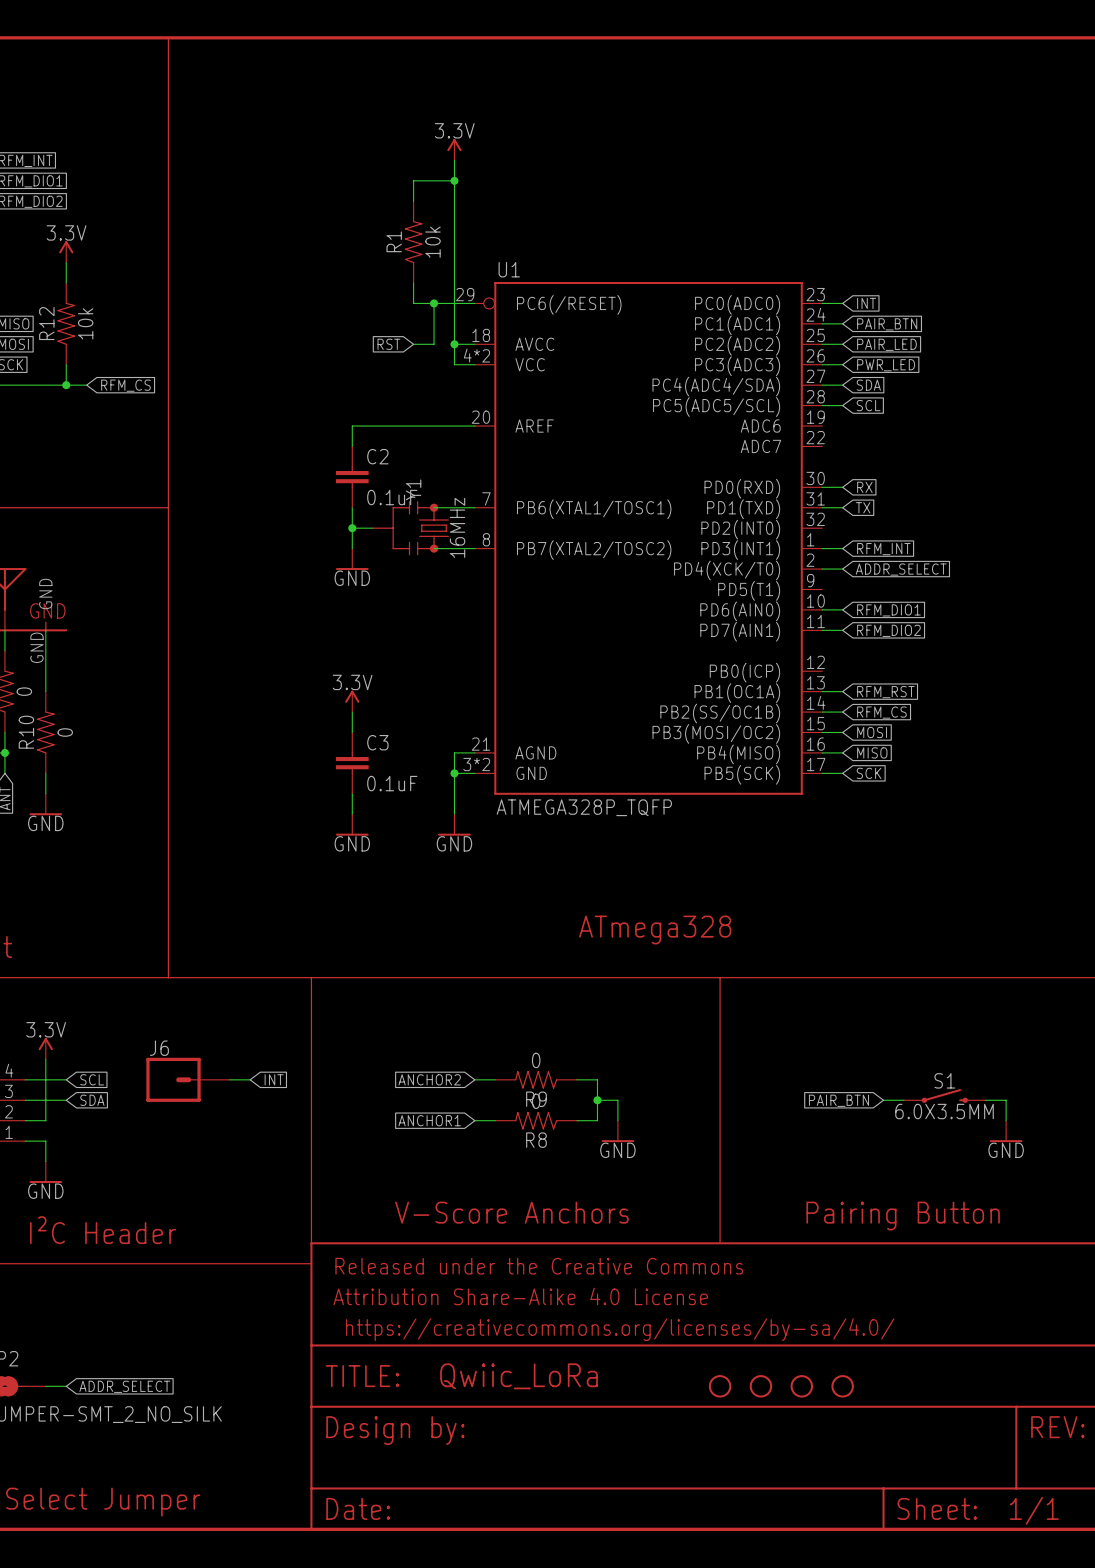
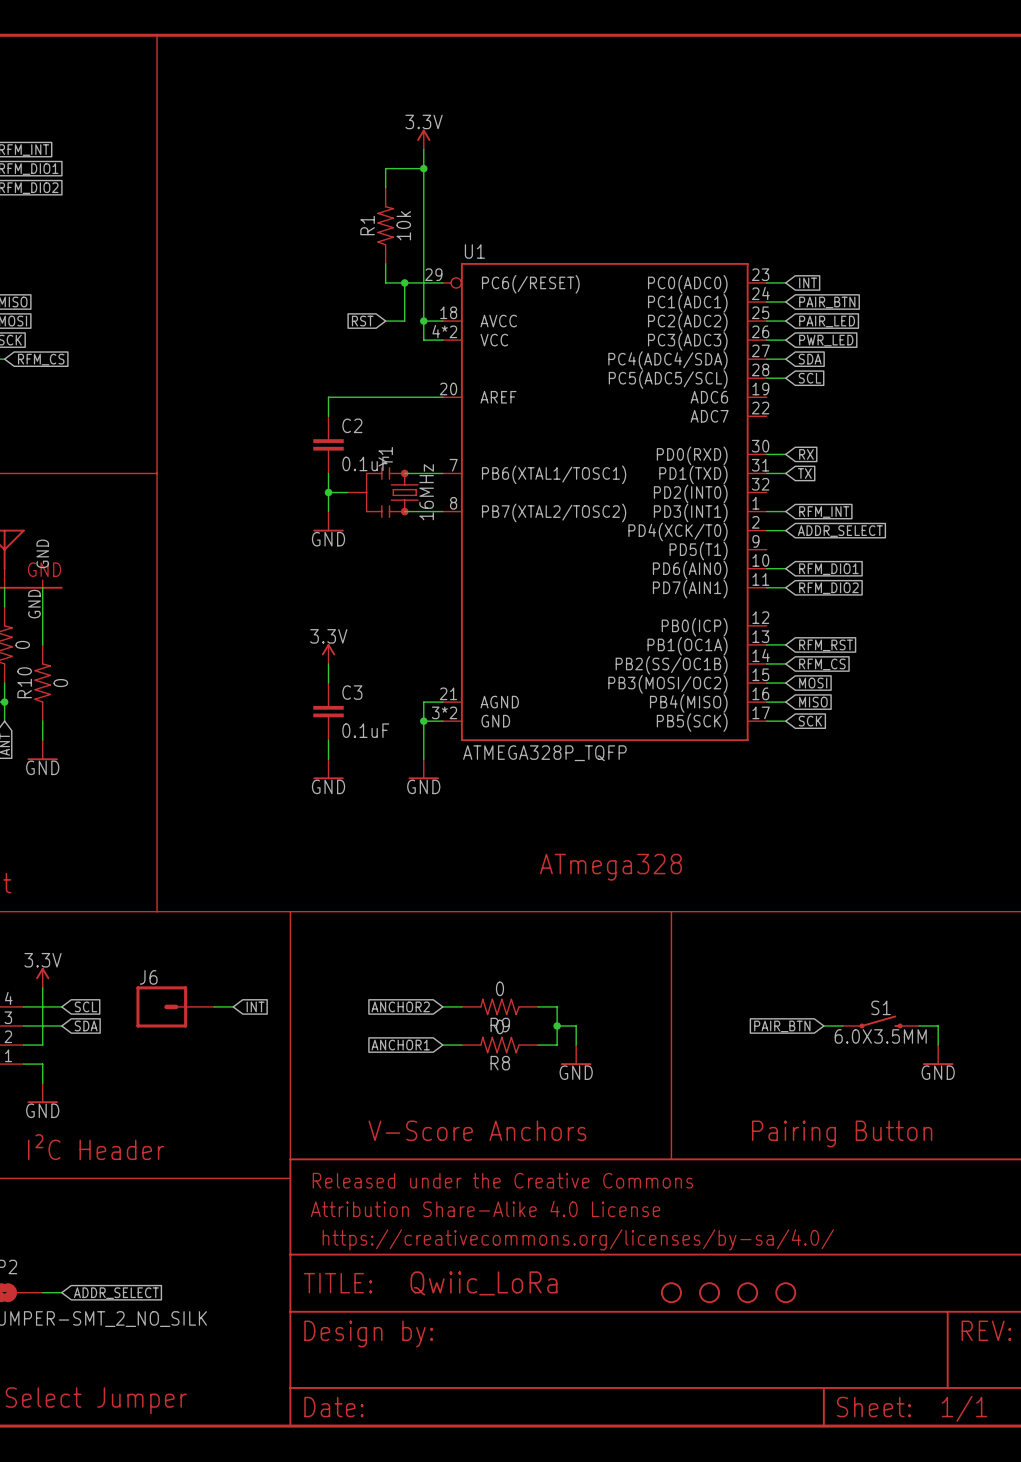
power symbol: 3.3V (66, 251) -> none
wire: (66, 262) (66, 283) -> none
R12: 10k (66, 323) -> none
wire: (66, 364) (66, 385) -> none
wire: (4, 385) (86, 385) -> none
junction: (66, 385) -> none
global label position: RFM_CS (125, 385) -> RFM_CS (41, 359)

